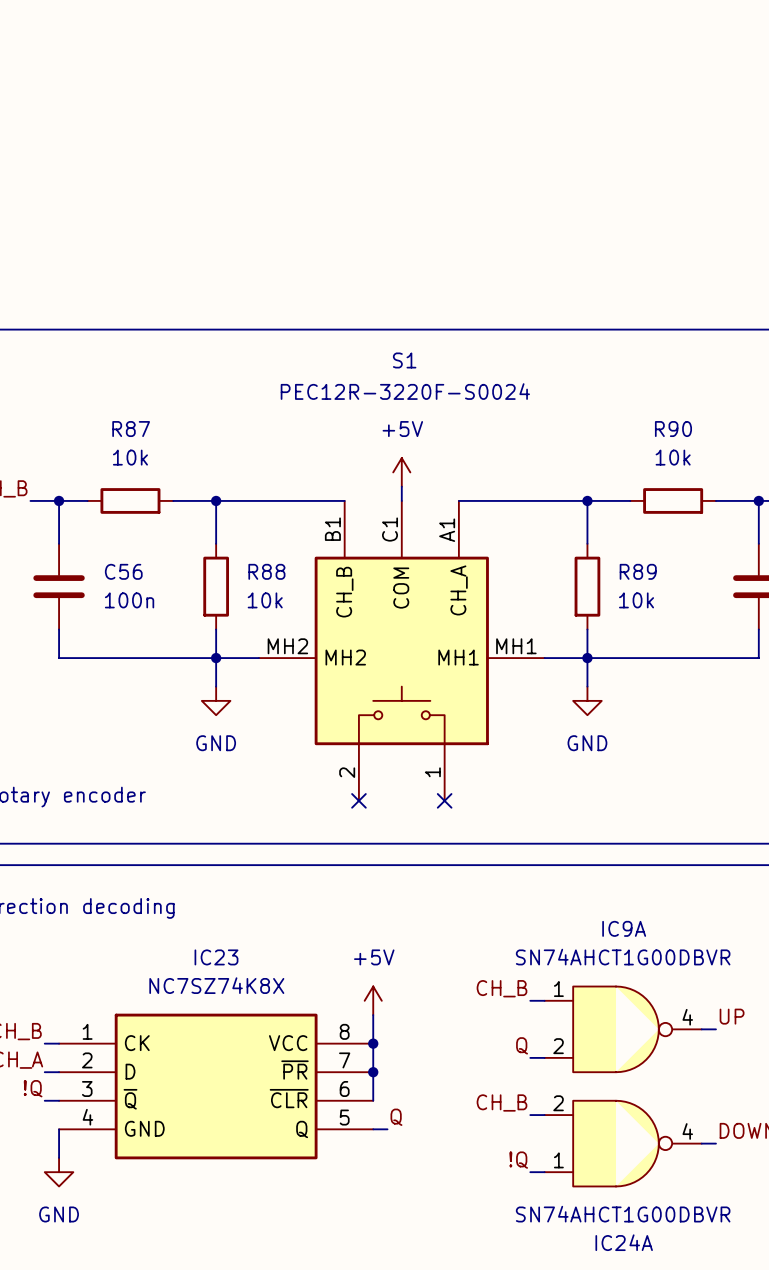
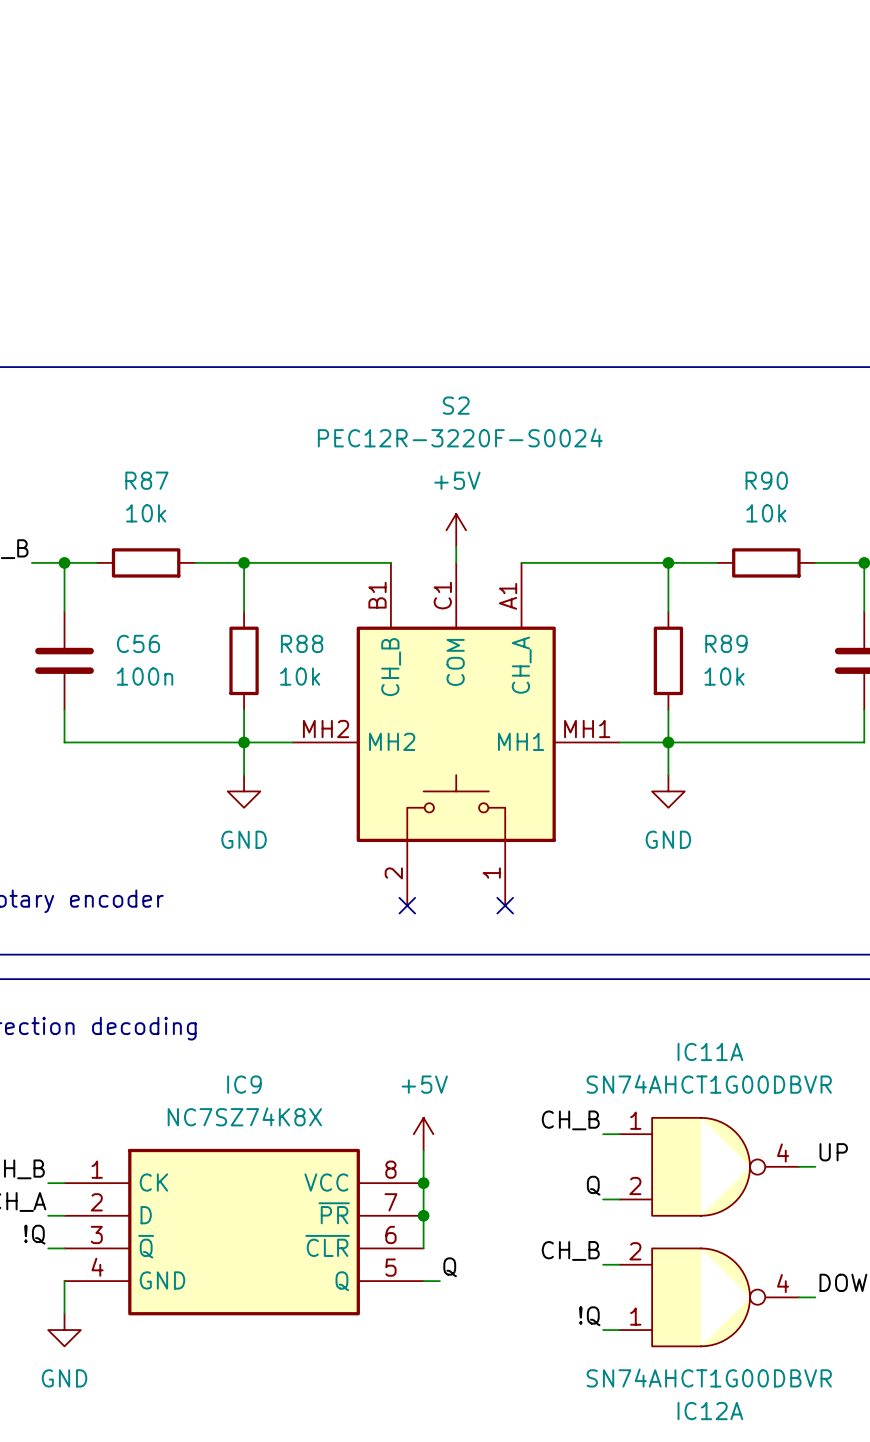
S1 name: S1 (404, 360) -> S2 (456, 405)
IC9A name: IC9A (624, 928) -> IC11A (710, 1051)
IC23 name: IC23 (216, 957) -> IC9 (244, 1084)
IC24A name: IC24A (624, 1242) -> IC12A (710, 1411)

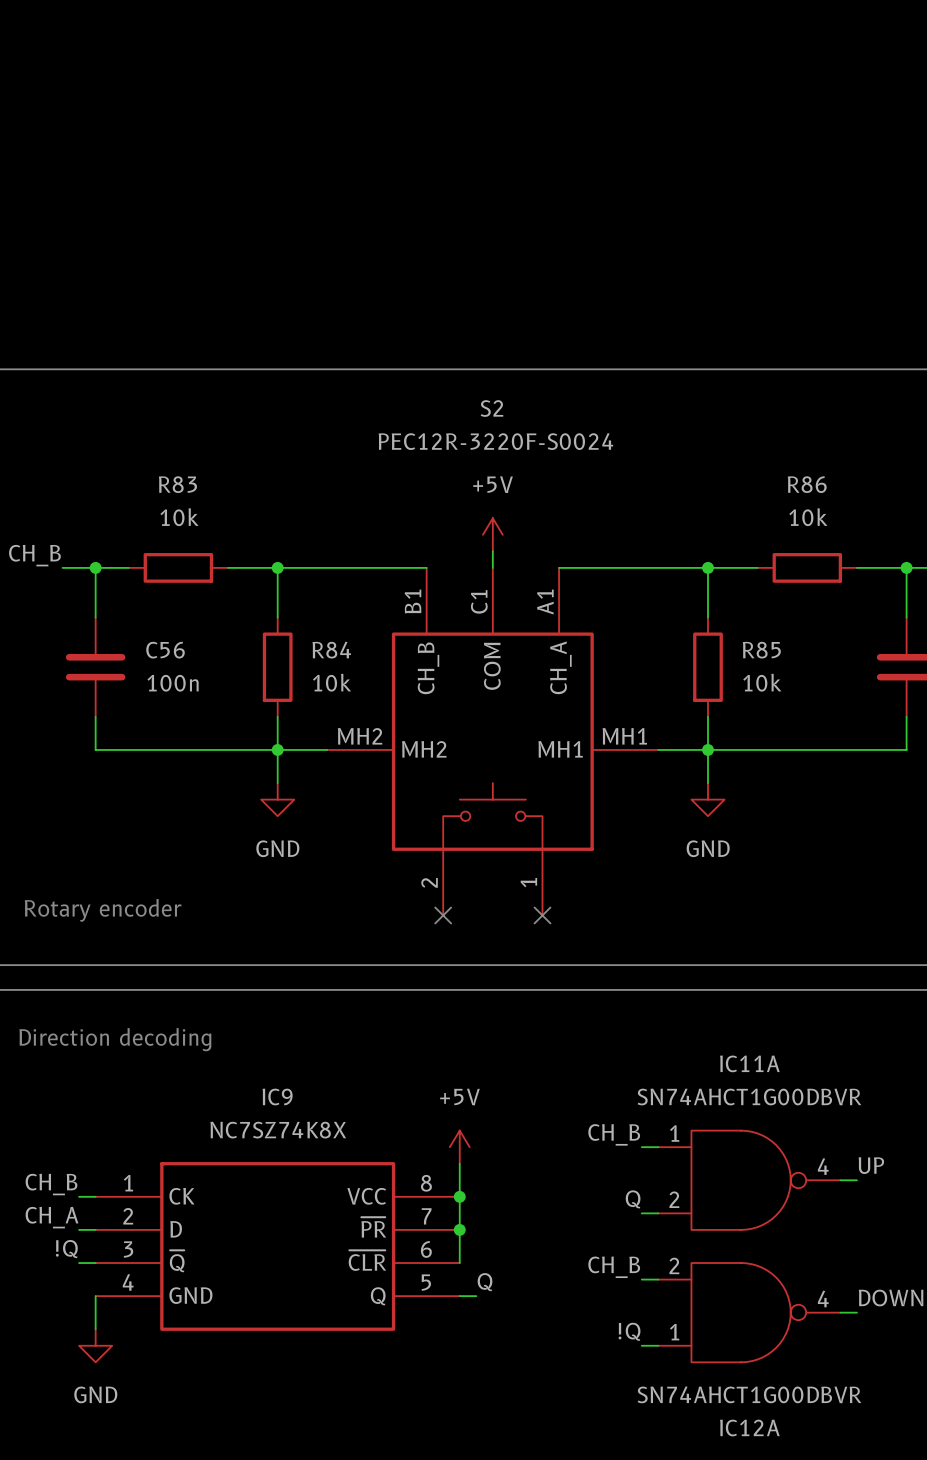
R87 name: R87 (146, 480) -> R83 (177, 484)
R90 name: R90 (766, 480) -> R86 (807, 484)
R88 name: R88 (302, 643) -> R84 (331, 650)
R89 name: R89 (726, 643) -> R85 (761, 650)

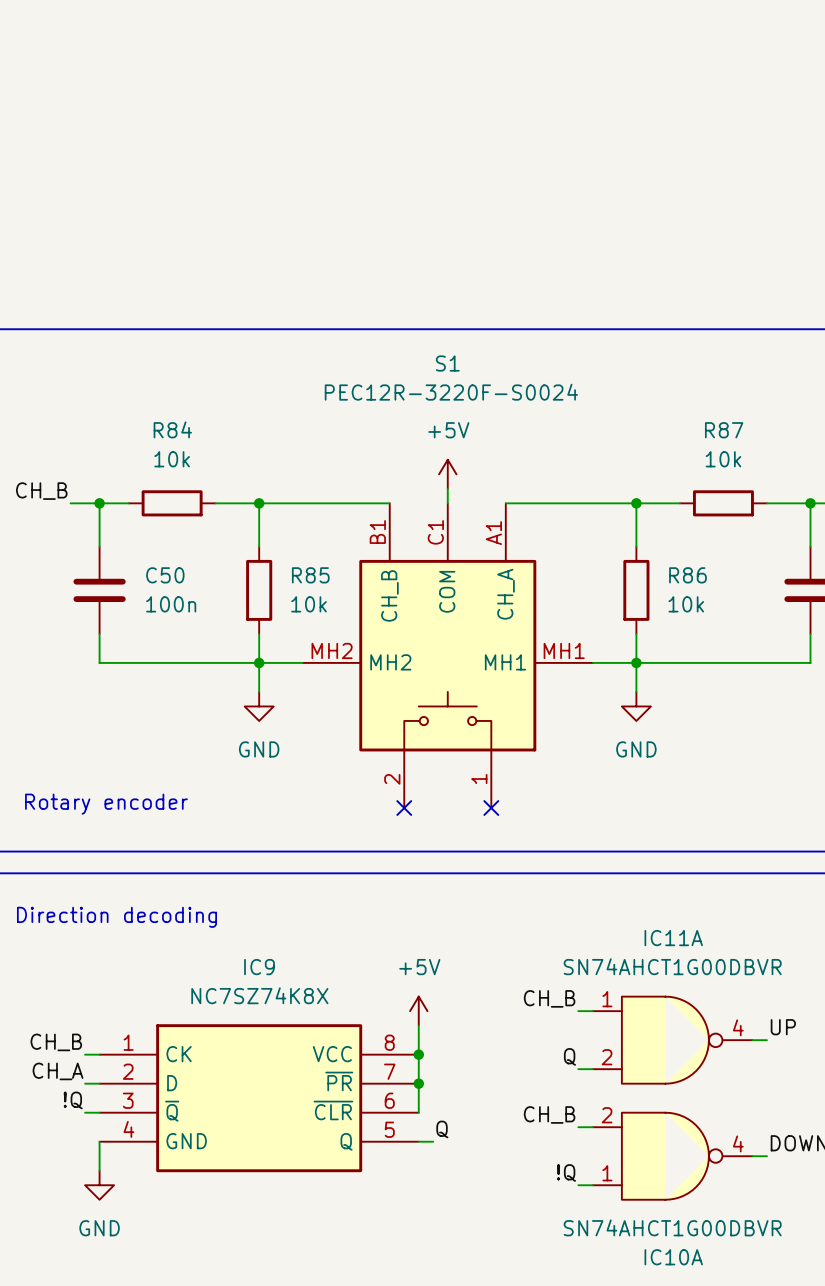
S2 name: S2 (491, 408) -> S1 (447, 363)
R83 name: R83 (177, 484) -> R84 (172, 429)
R86 name: R86 (807, 484) -> R87 (724, 430)
C56 name: C56 (165, 650) -> C50 (165, 575)
R84 name: R84 (331, 650) -> R85 (310, 575)
R85 name: R85 (761, 650) -> R86 (687, 575)
IC12A name: IC12A (749, 1427) -> IC10A (673, 1257)

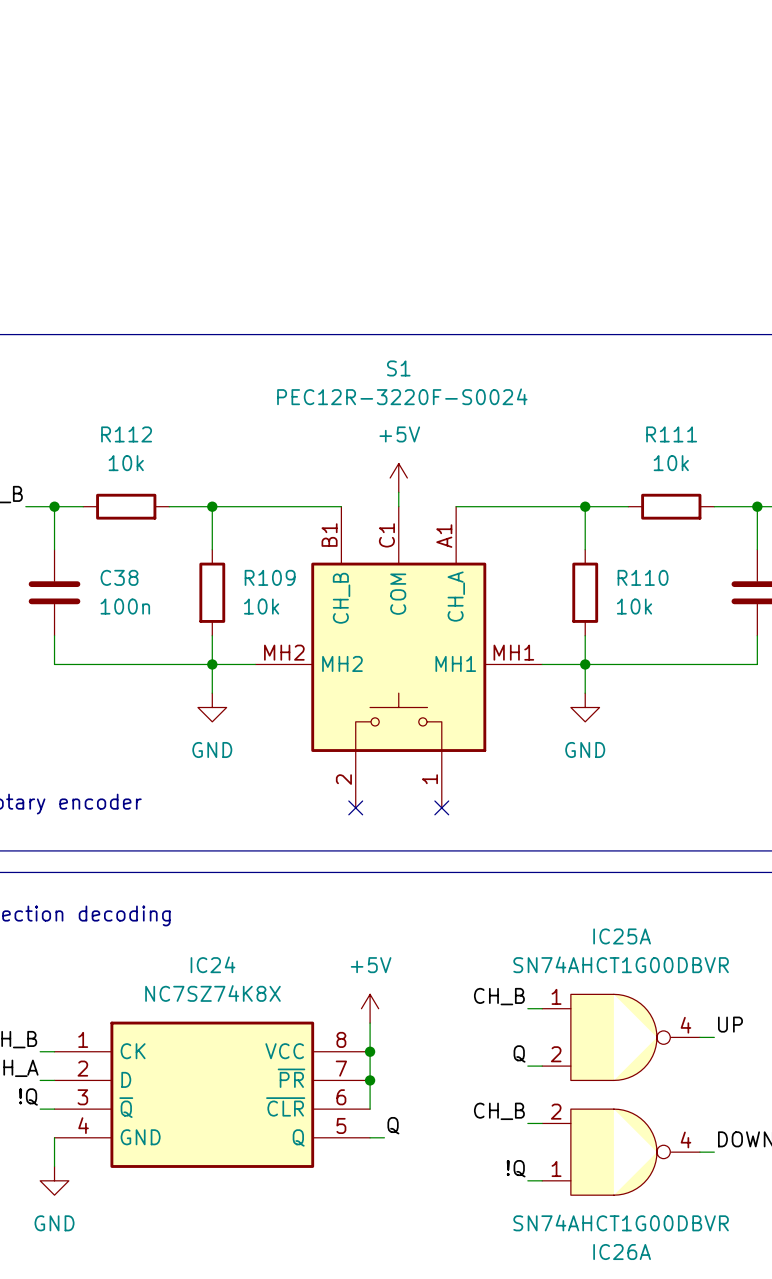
R84 name: R84 (172, 429) -> R112 (126, 434)
R87 name: R87 (724, 430) -> R111 (671, 434)
C50 name: C50 (165, 575) -> C38 (119, 577)
R85 name: R85 (310, 575) -> R109 (270, 577)
R86 name: R86 (687, 575) -> R110 (643, 577)
IC11A name: IC11A (673, 938) -> IC25A (622, 936)
IC9 name: IC9 (259, 967) -> IC24 (212, 964)
IC10A name: IC10A (673, 1257) -> IC26A (622, 1252)

